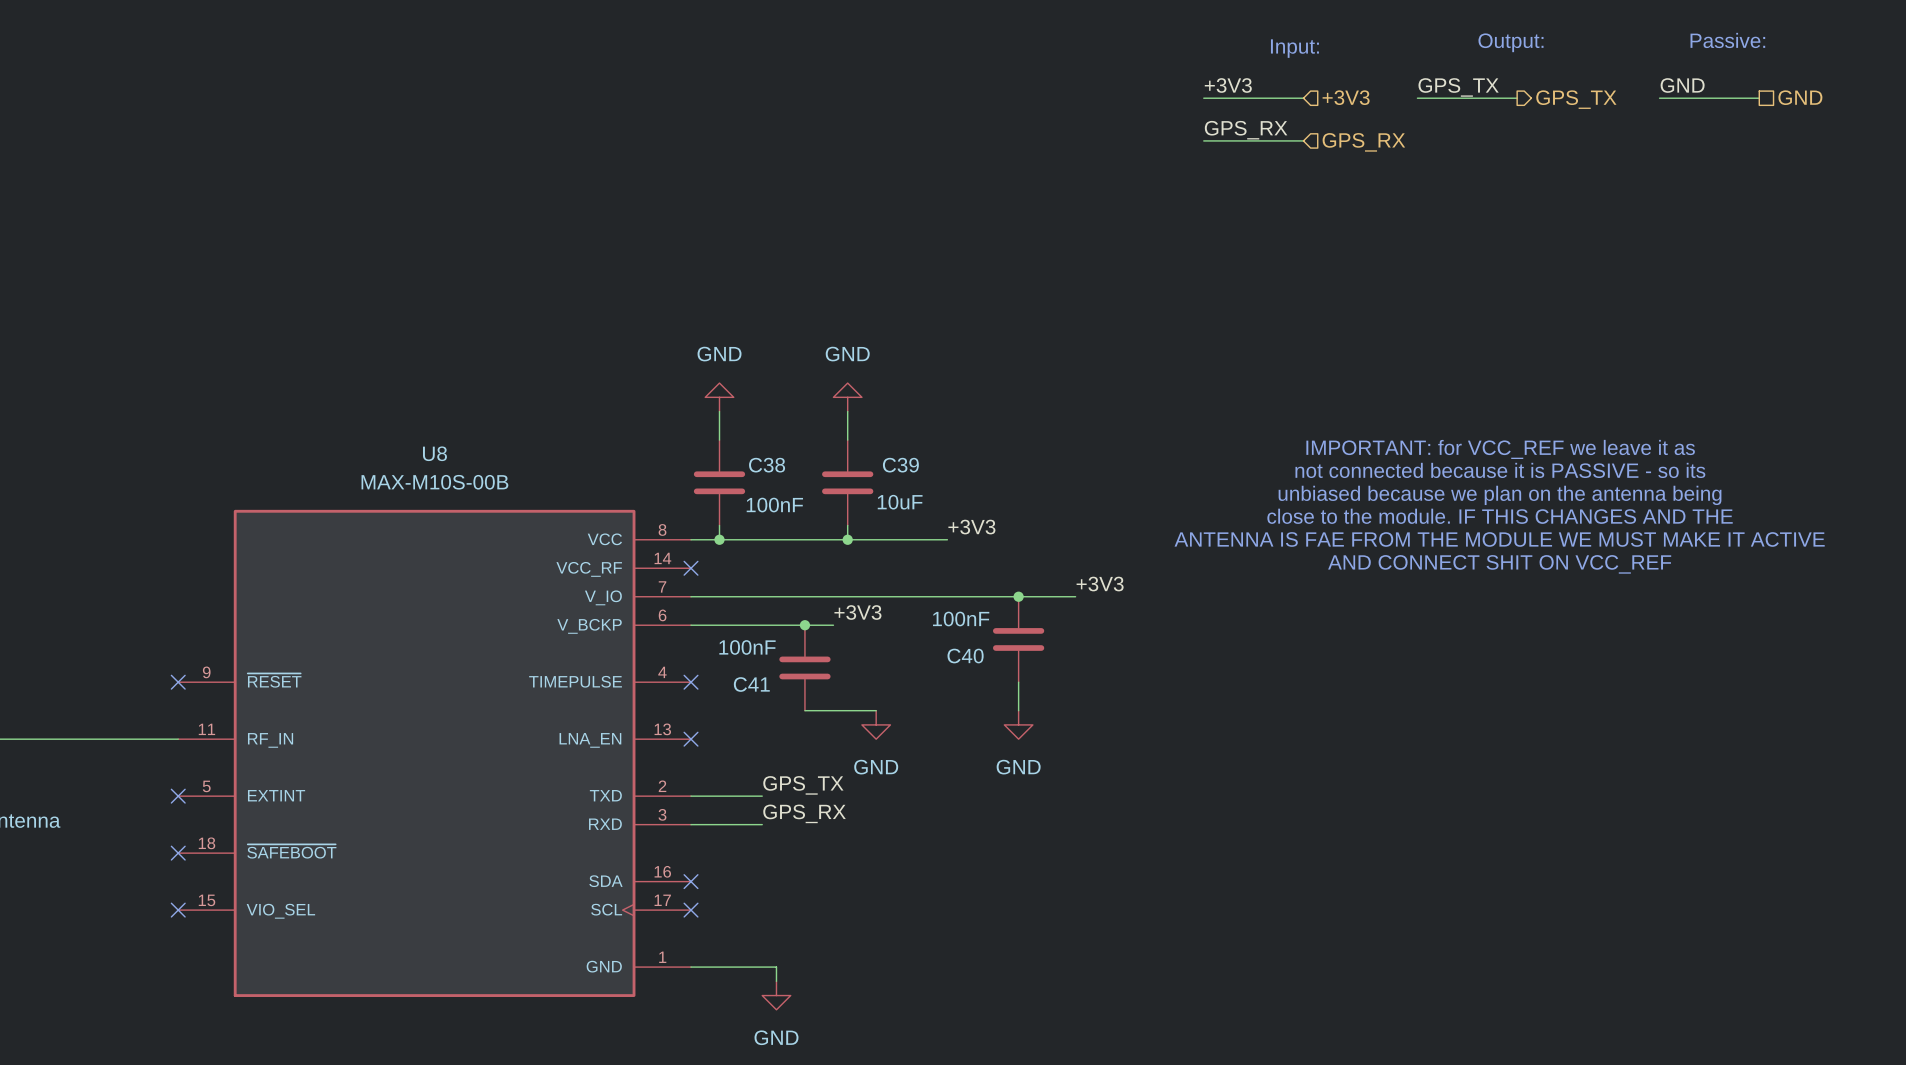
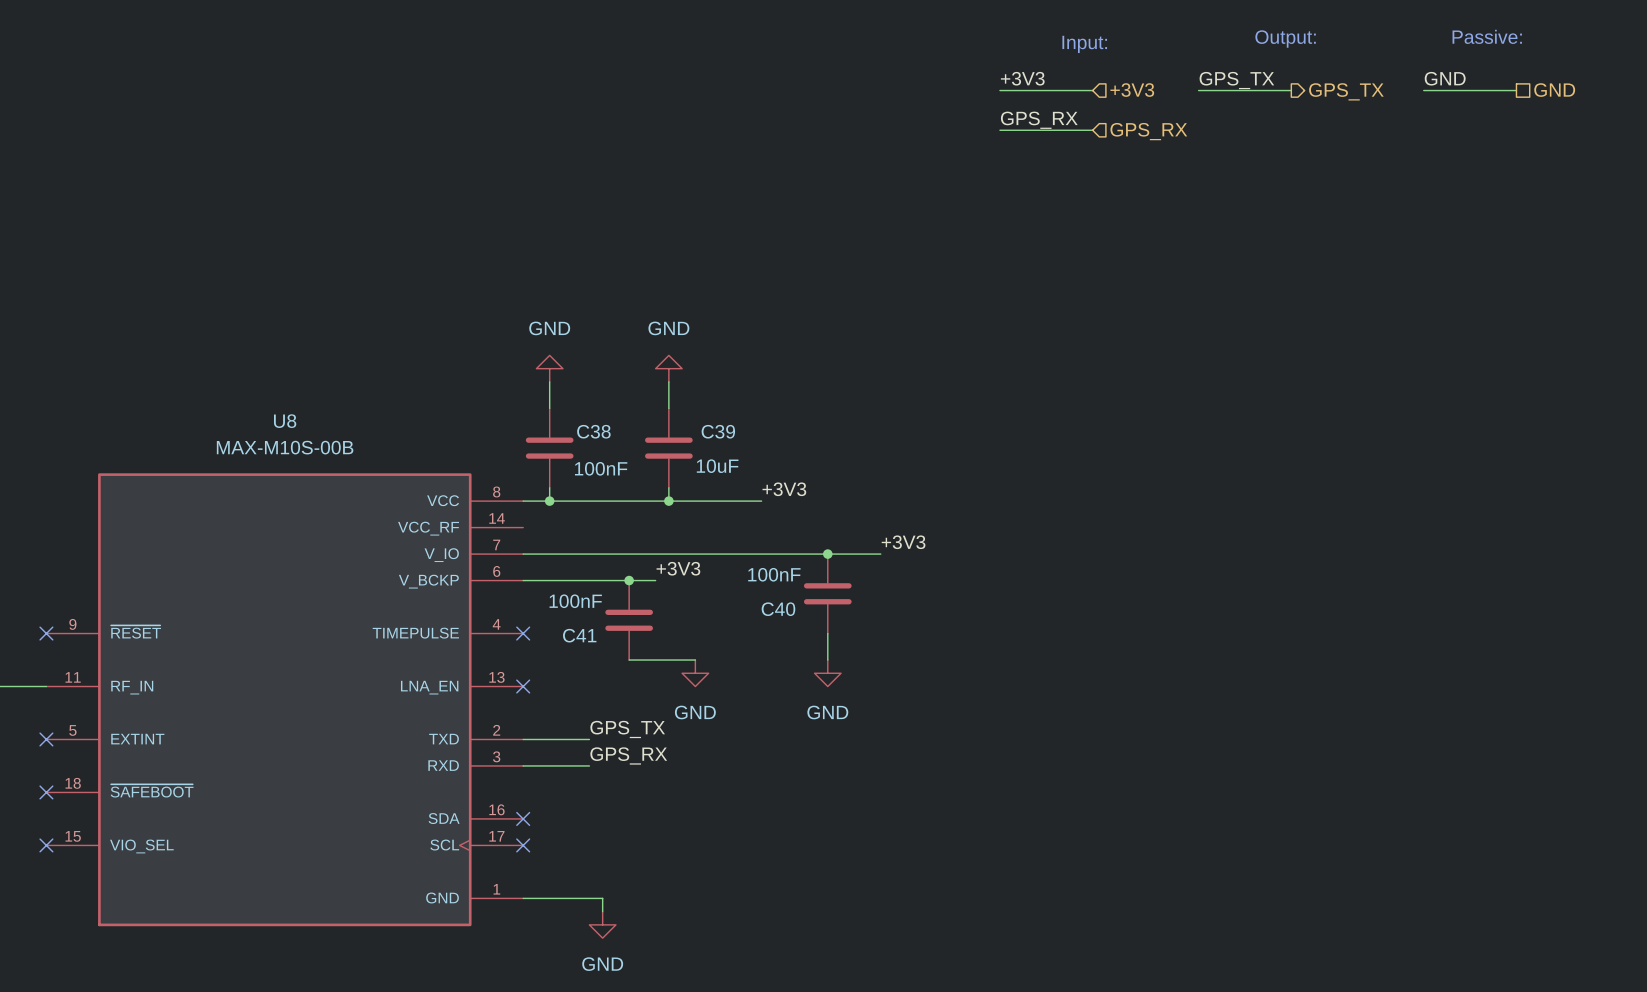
text: IMPORTANT: for VCC_REF we leave it as (1500, 449) -> none
text: not connected because it is PASSIVE - so its (1500, 470) -> none
text: unbiased because we plan on the antenna being (1500, 495) -> none
text: close to the module. IF THIS CHANGES AND THE (1500, 516) -> none
text: ANTENNA IS FAE FROM THE MODULE WE MUST MAKE IT ACTIVE (1499, 539) -> none
text: AND CONNECT SHIT ON VCC_REF (1499, 564) -> none
no-connect mark: (691, 568) -> none

